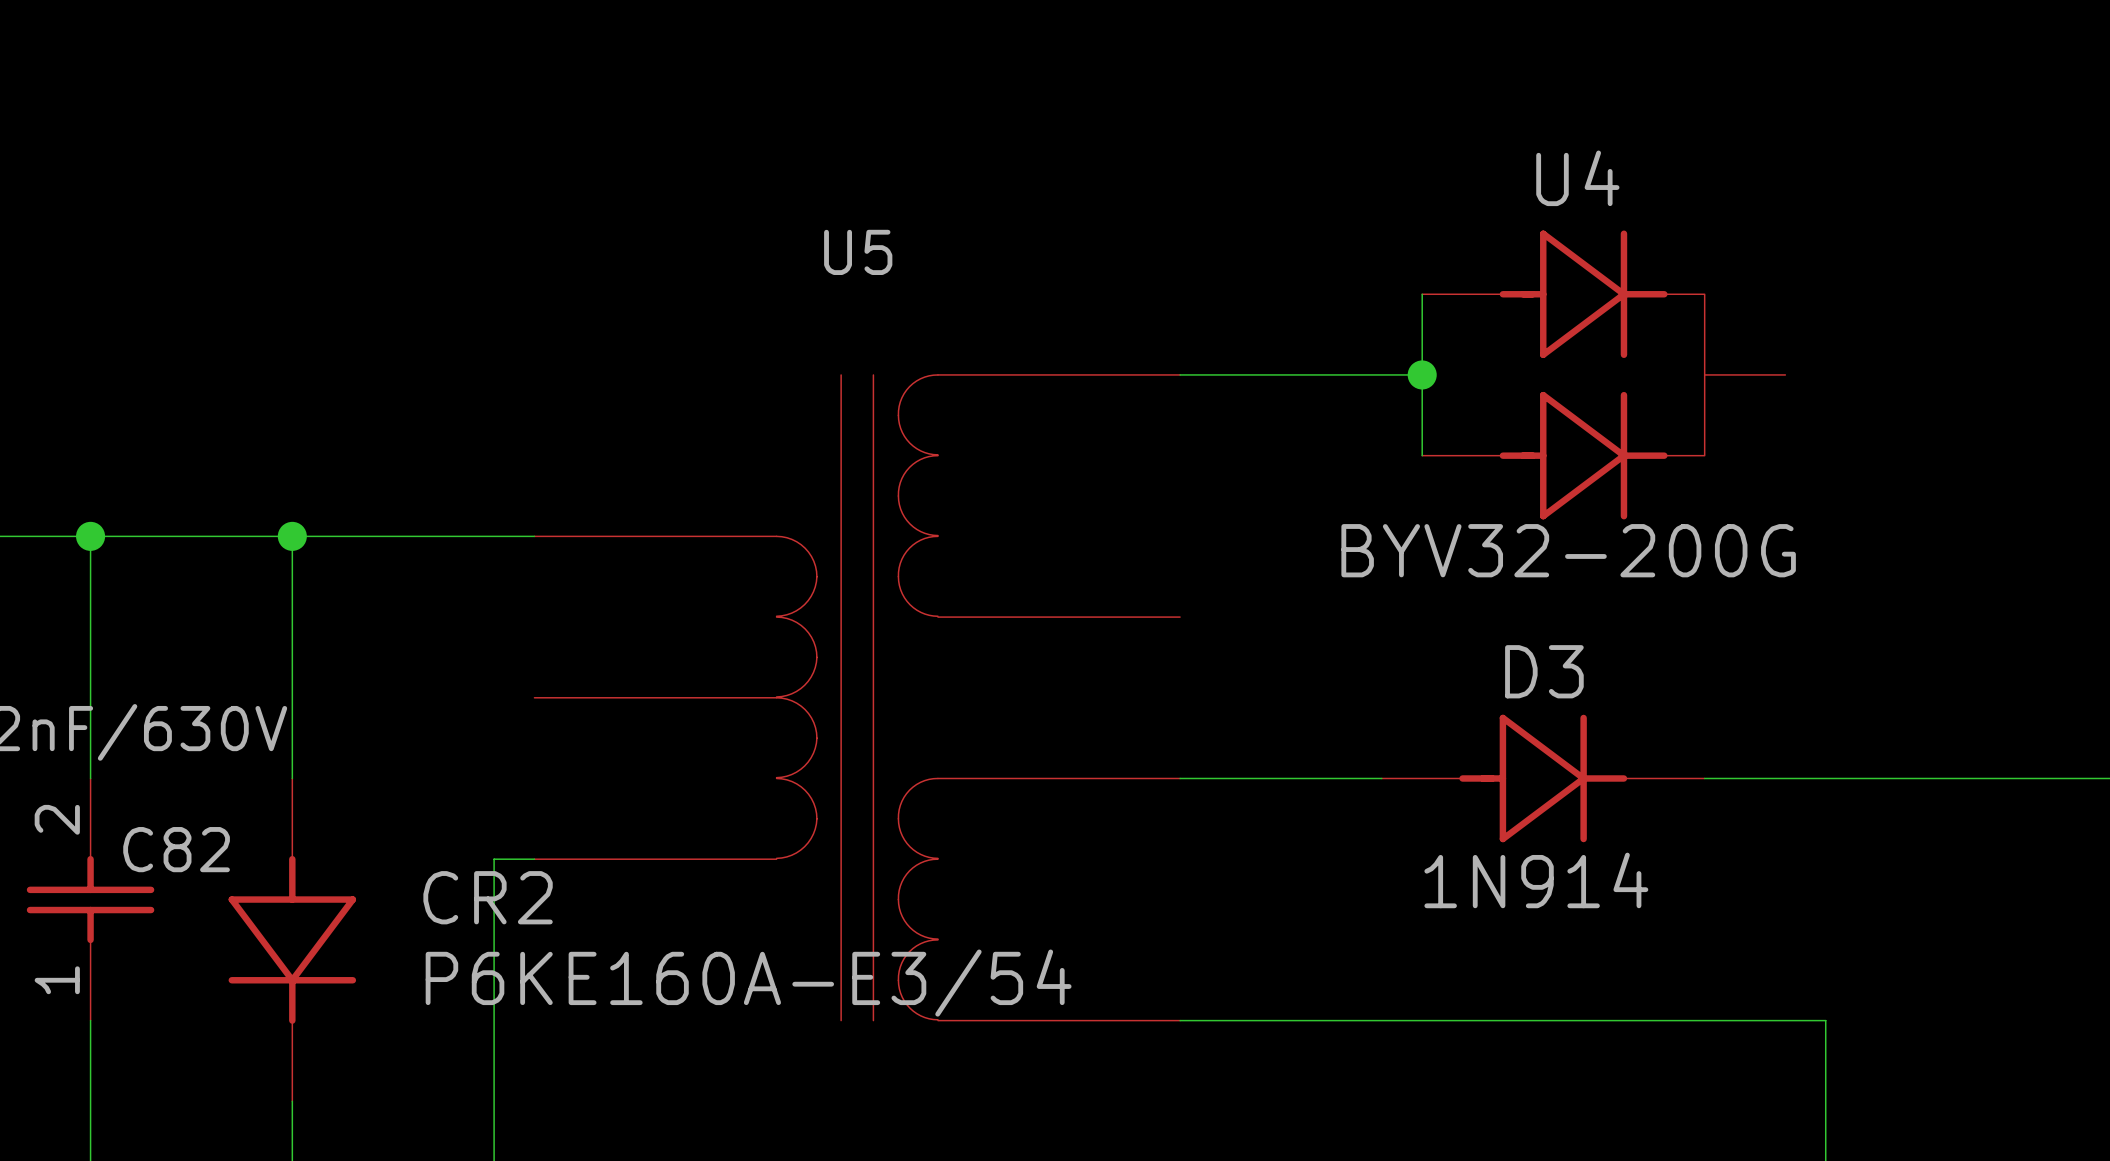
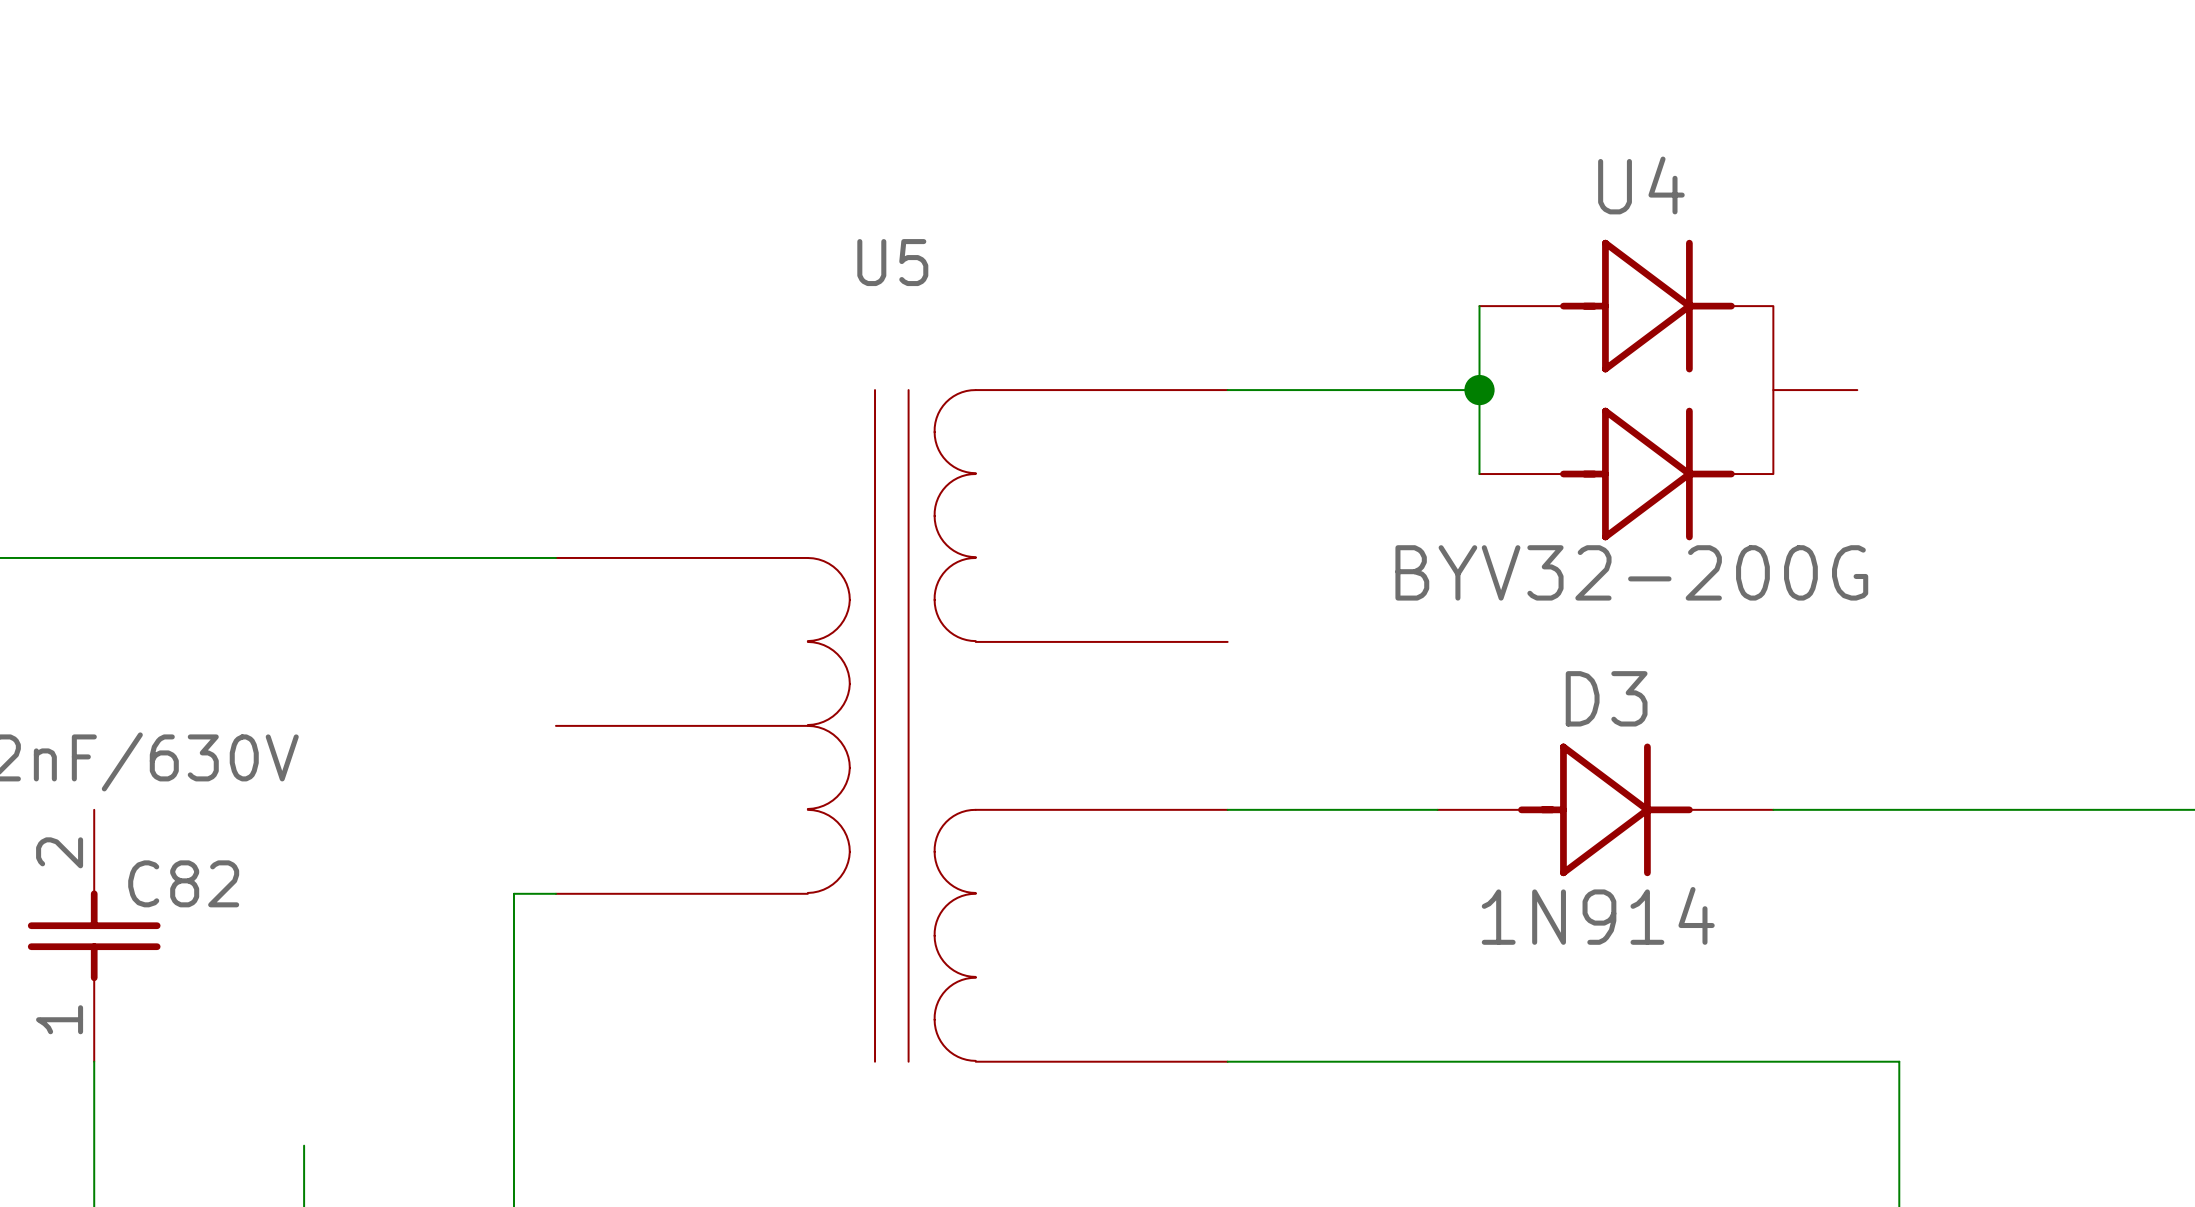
wire: (90, 536) (90, 778) -> none
junction: (90, 536) -> none
wire: (292, 536) (292, 778) -> none
junction: (292, 536) -> none
CR2: P6KE160A-E3/54 (292, 939) -> none

